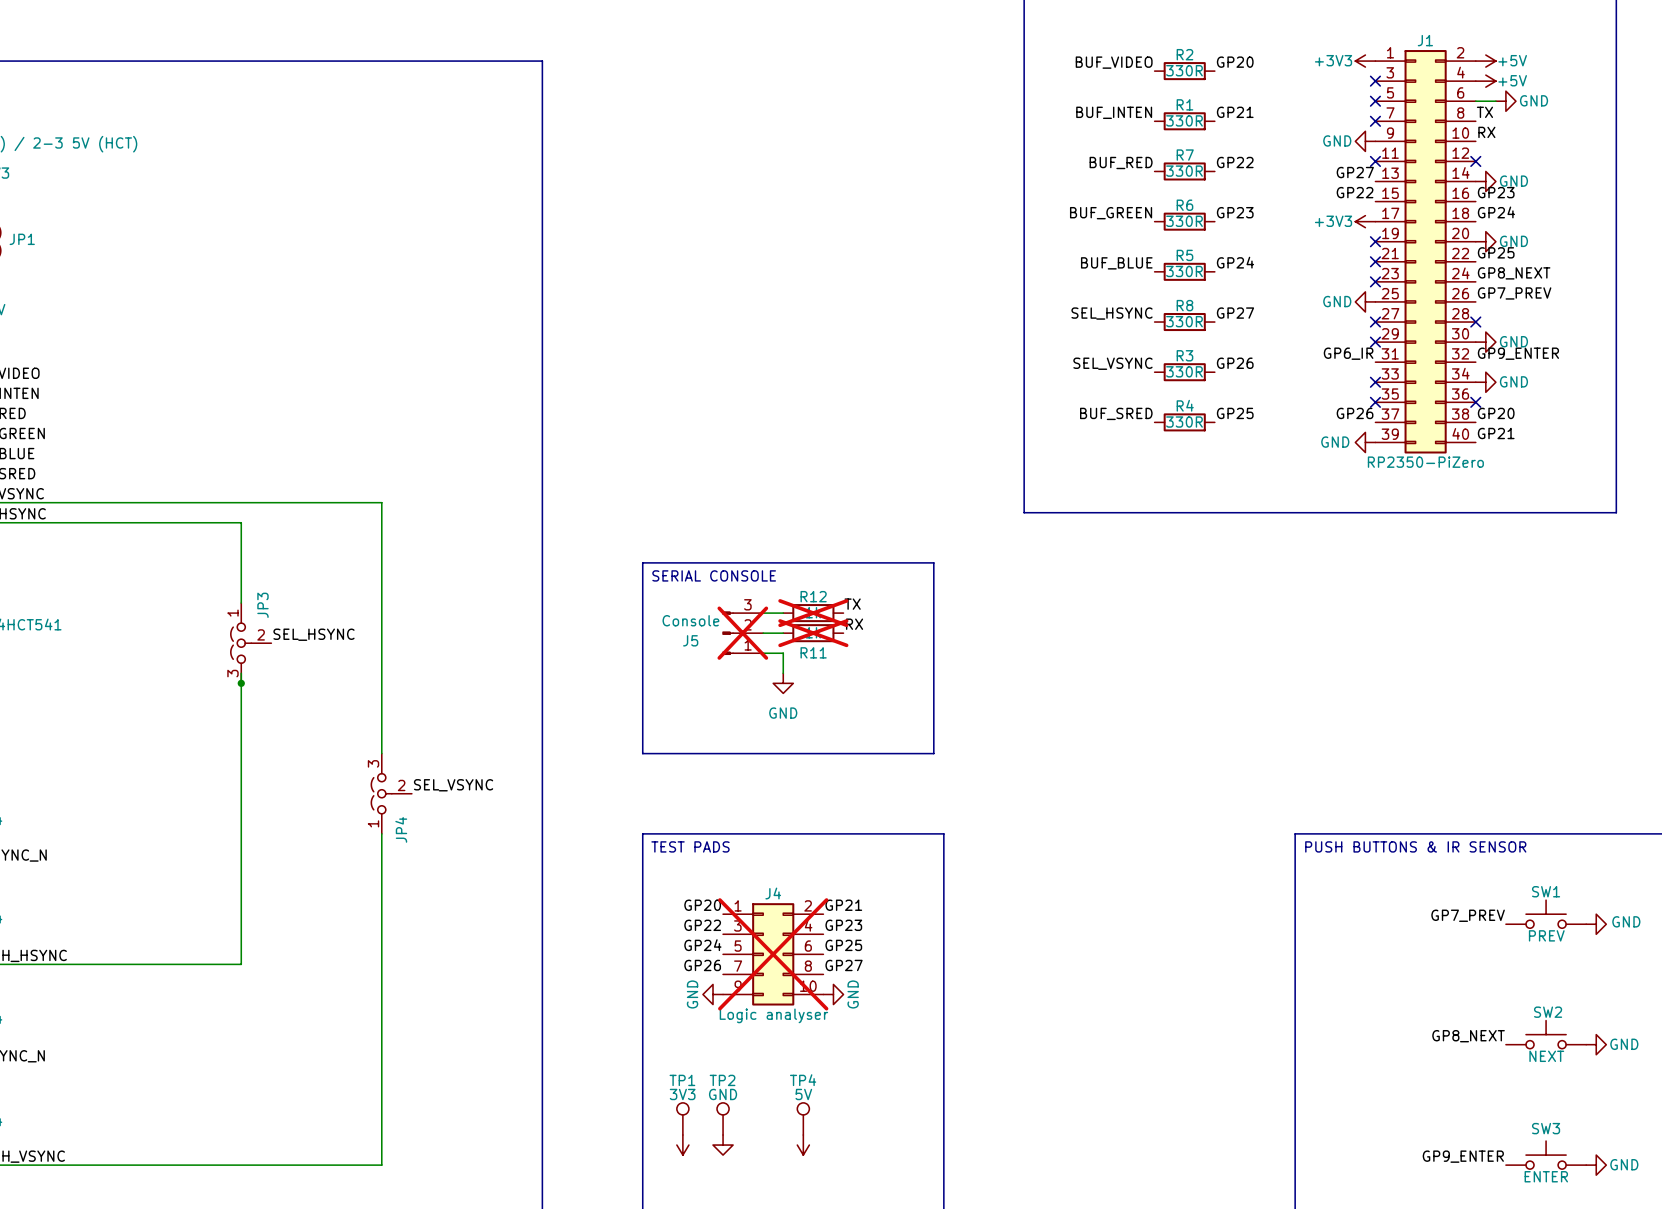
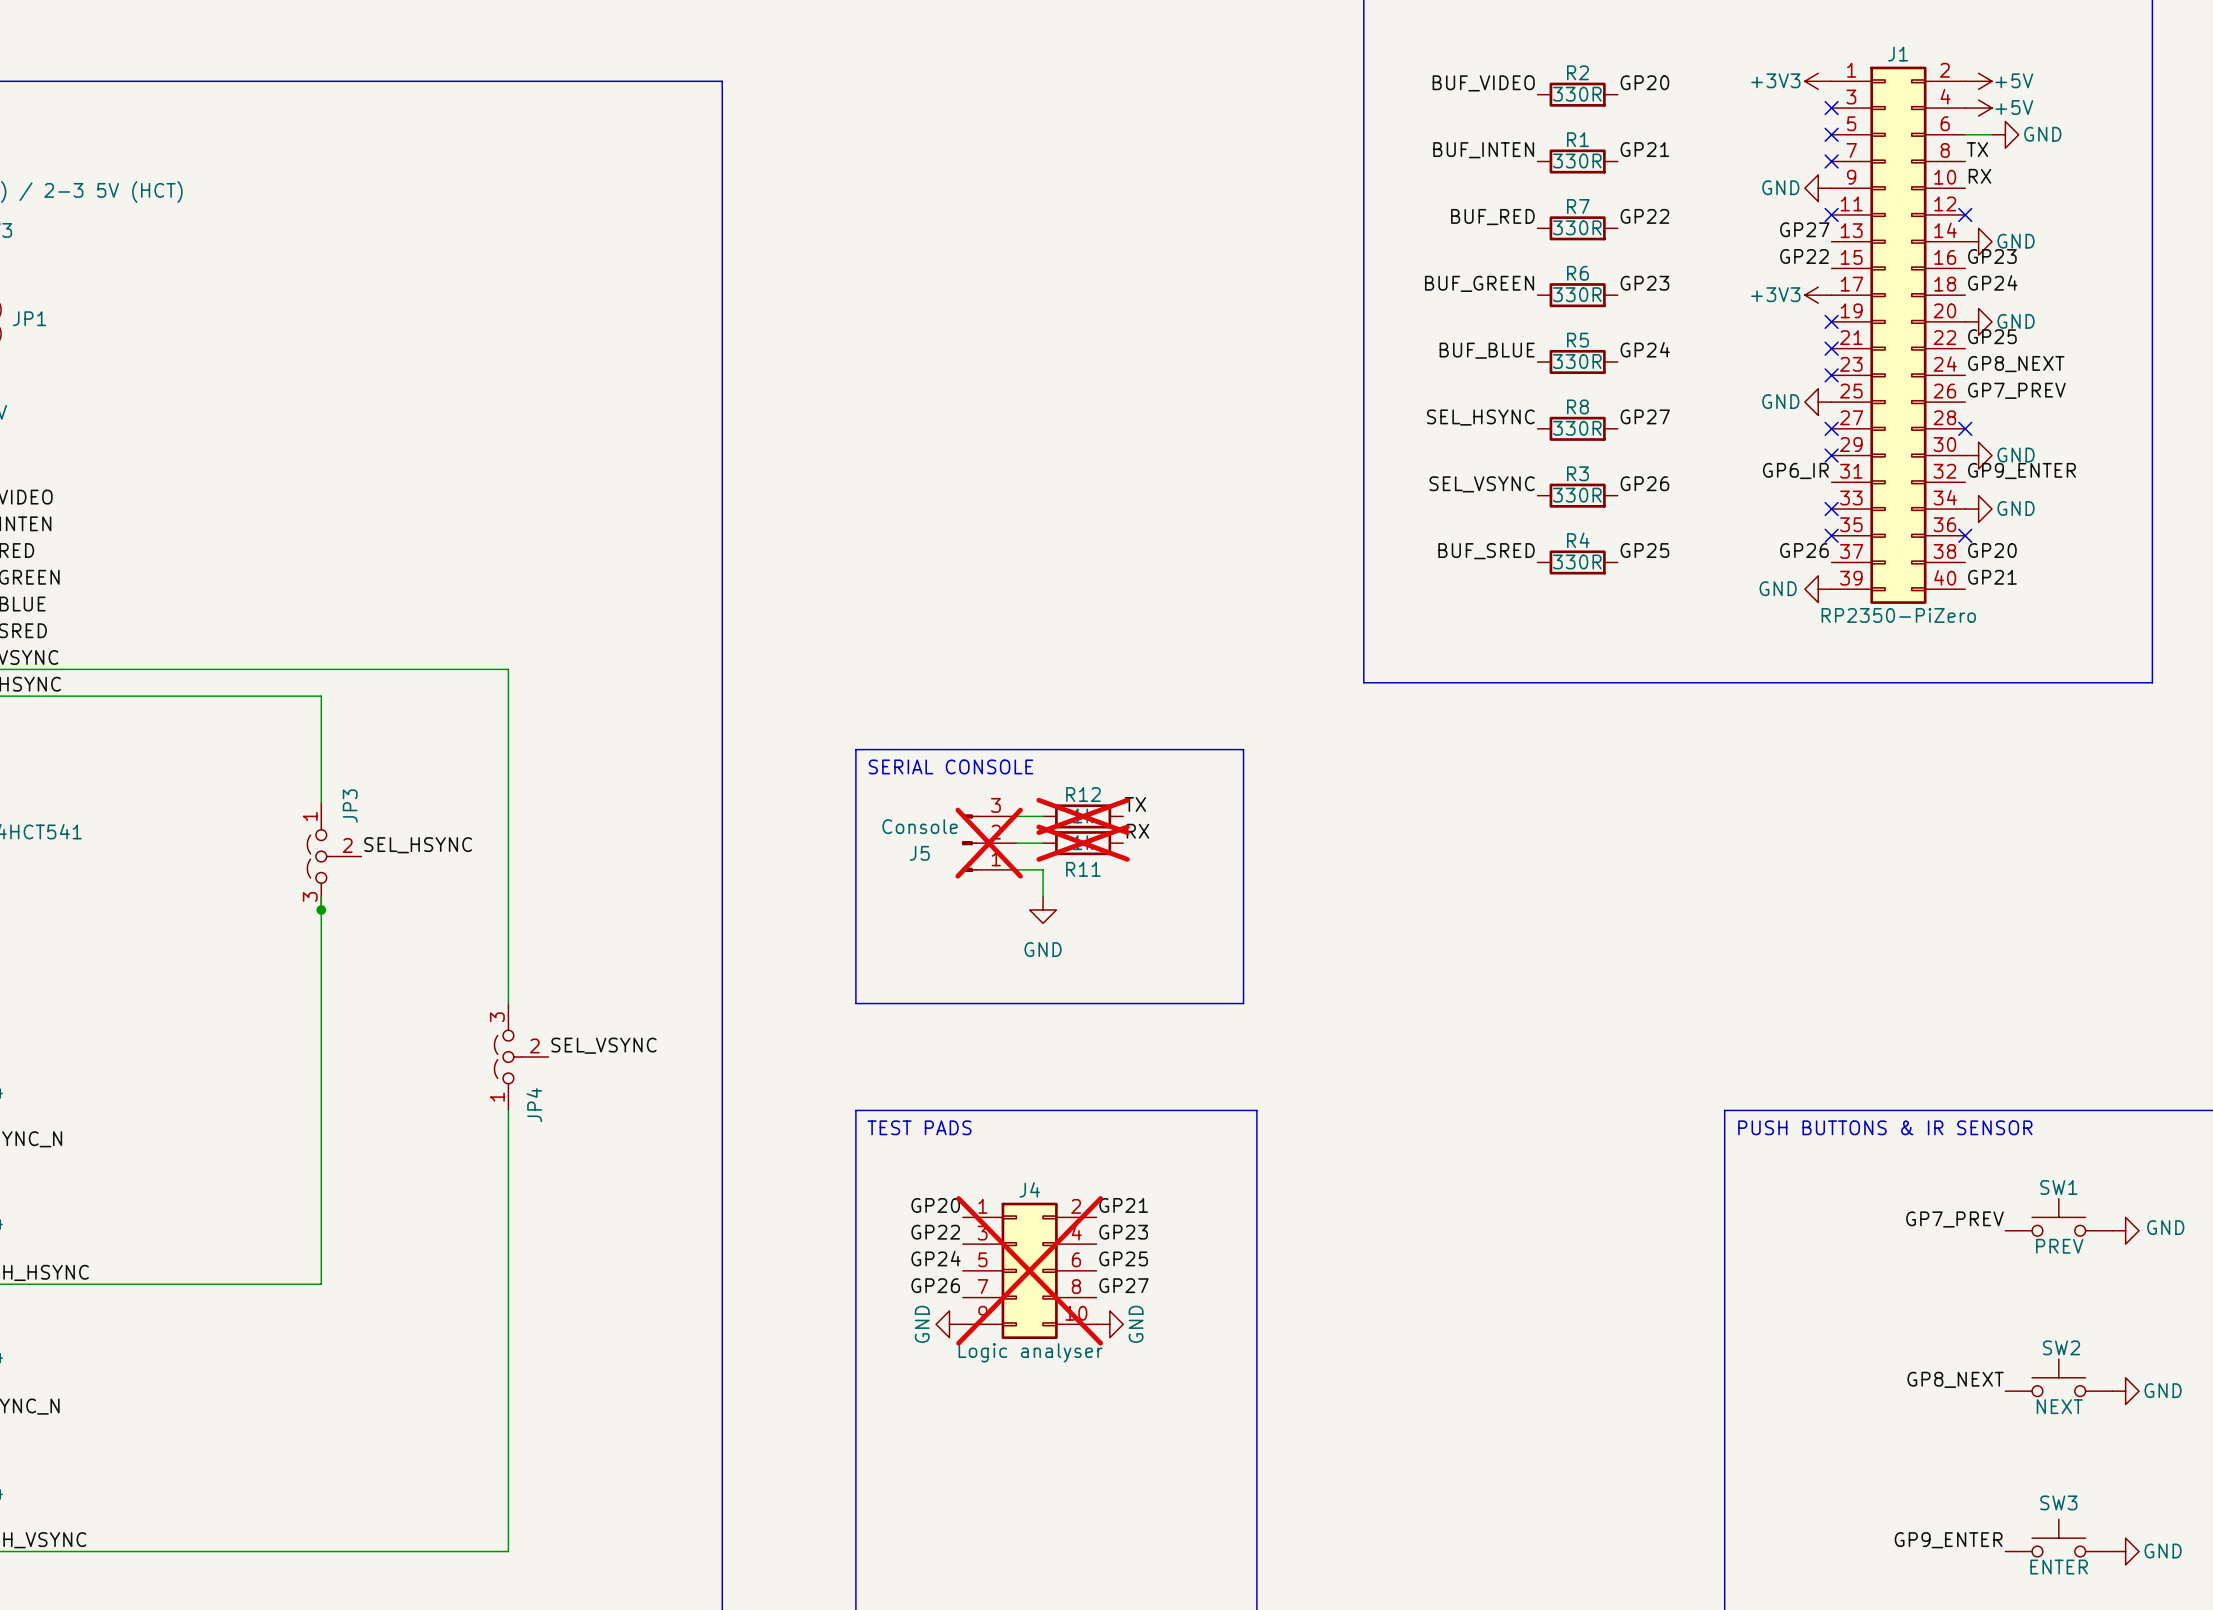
TP1: 3V3 (682, 1118) -> none
TP2: GND (723, 1118) -> none
TP4: 5V (803, 1118) -> none
power symbol: (682, 1145) -> none
power symbol: (723, 1145) -> none
power symbol: (803, 1145) -> none

